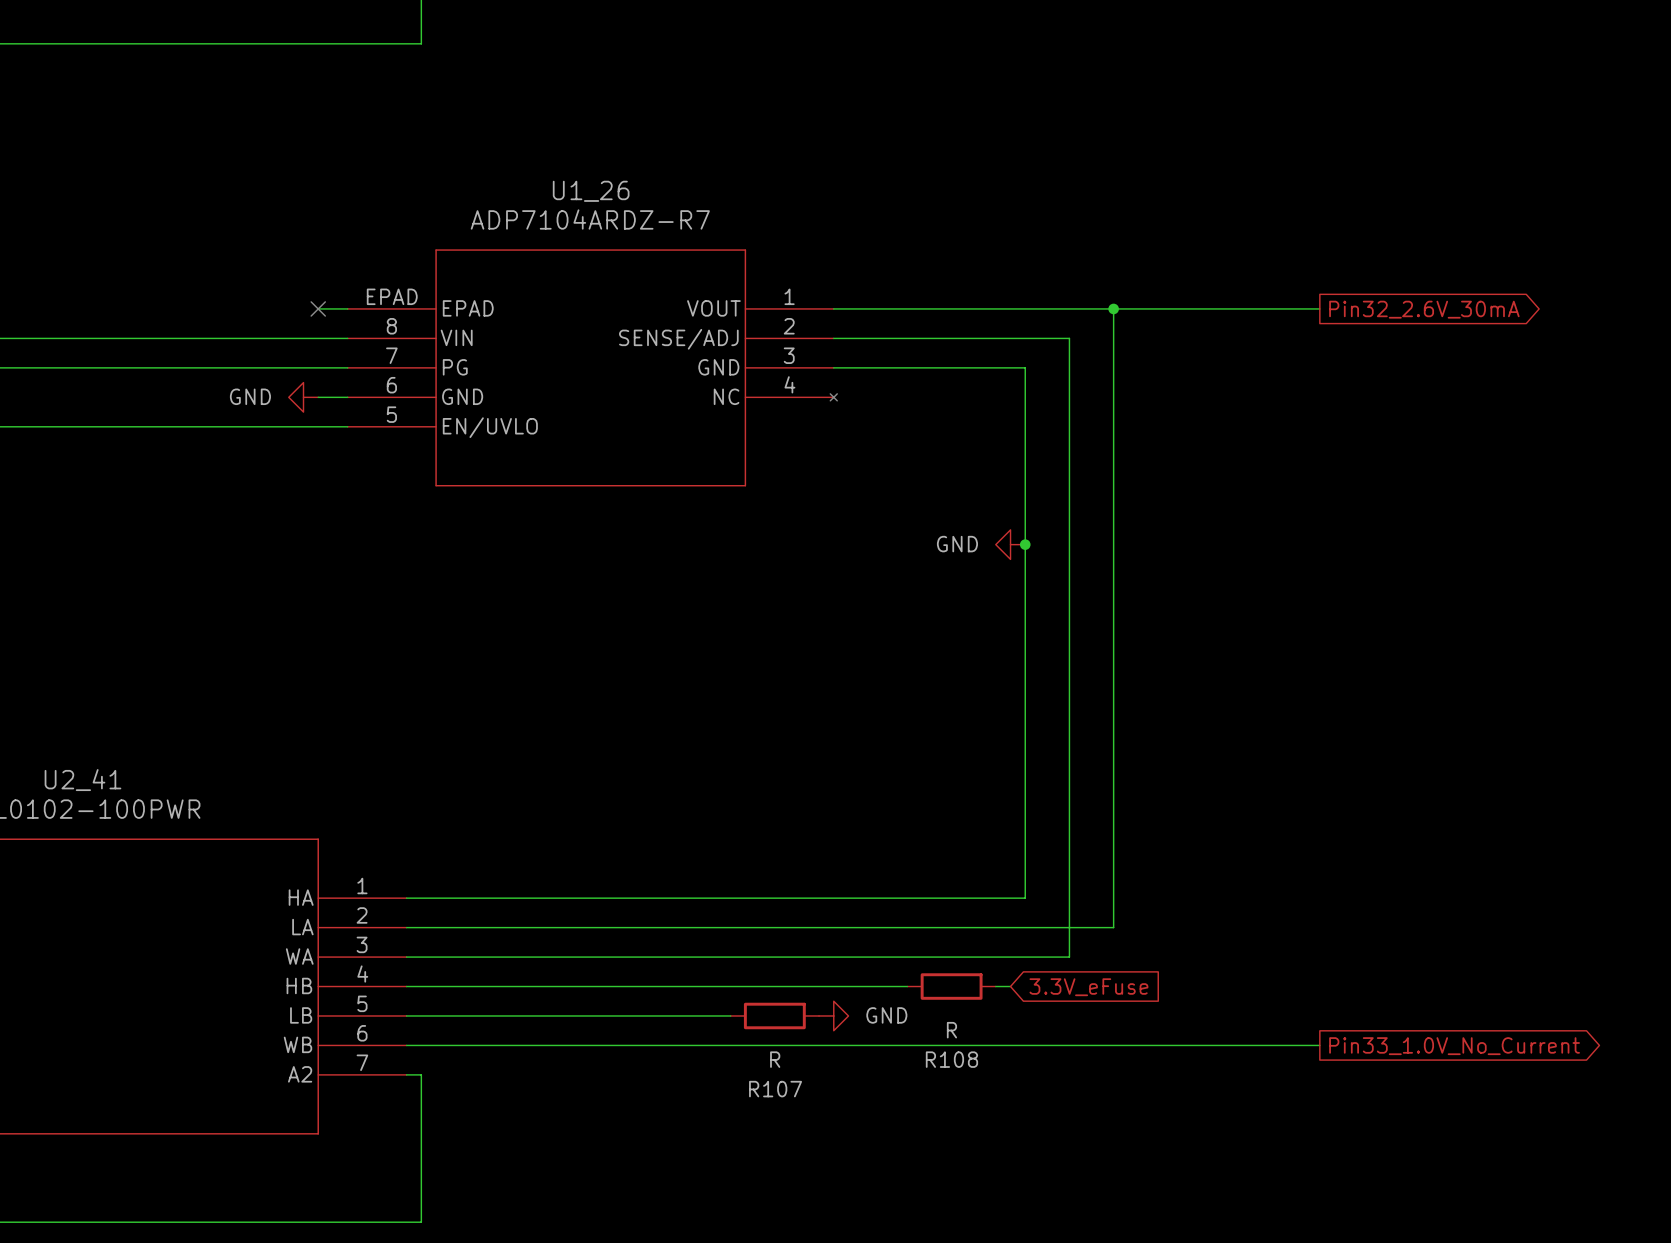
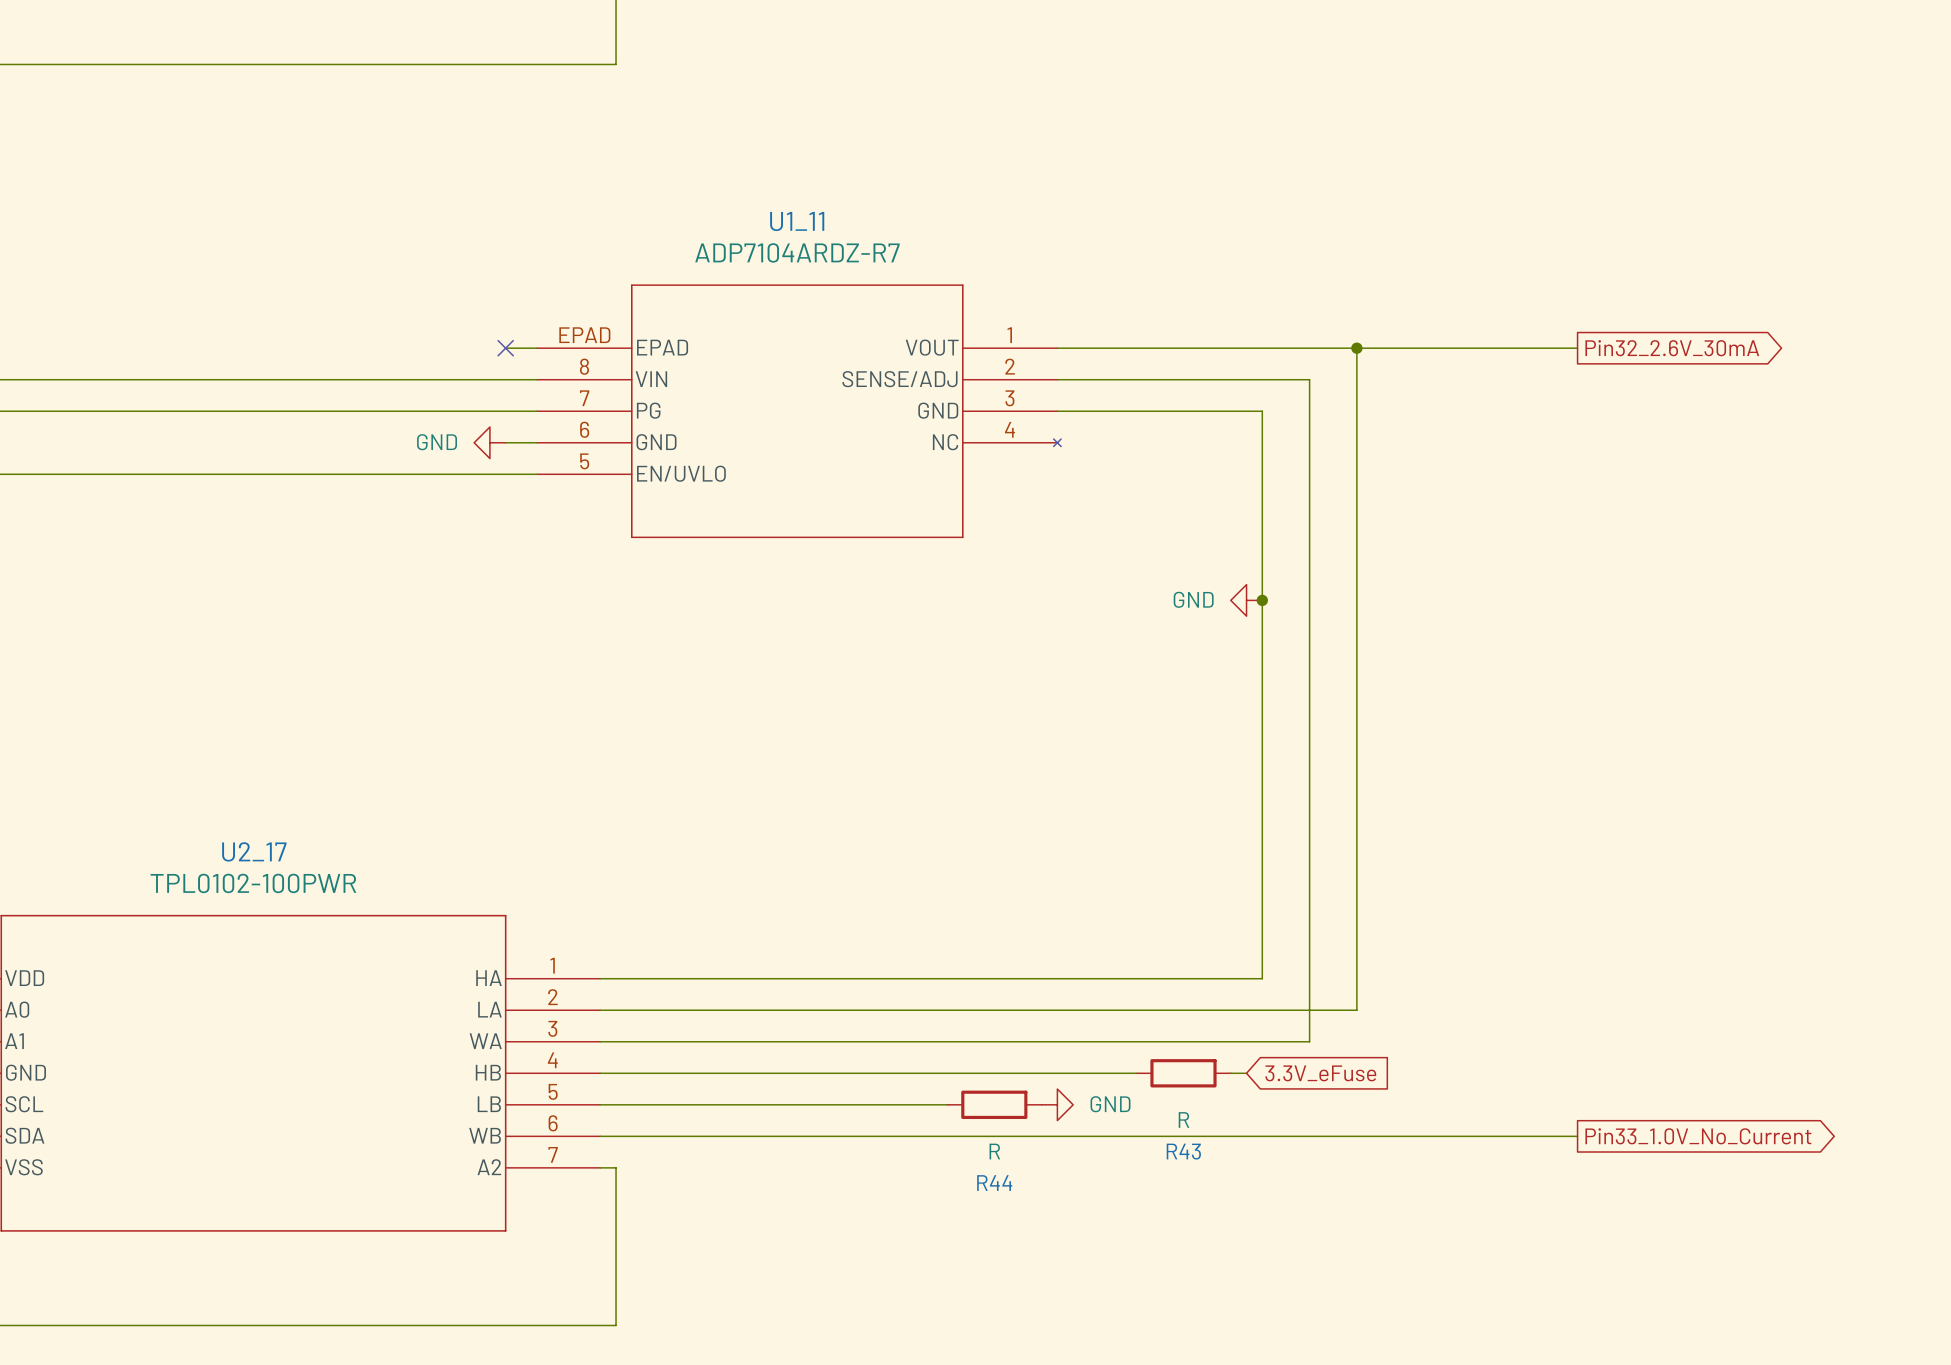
U1_26 name: U1_26 (591, 191) -> U1_11 (797, 221)
U2_41 name: U2_41 (82, 780) -> U2_17 (254, 851)
R108 name: R108 (951, 1059) -> R43 (1183, 1151)
R107 name: R107 (775, 1089) -> R44 (994, 1183)

